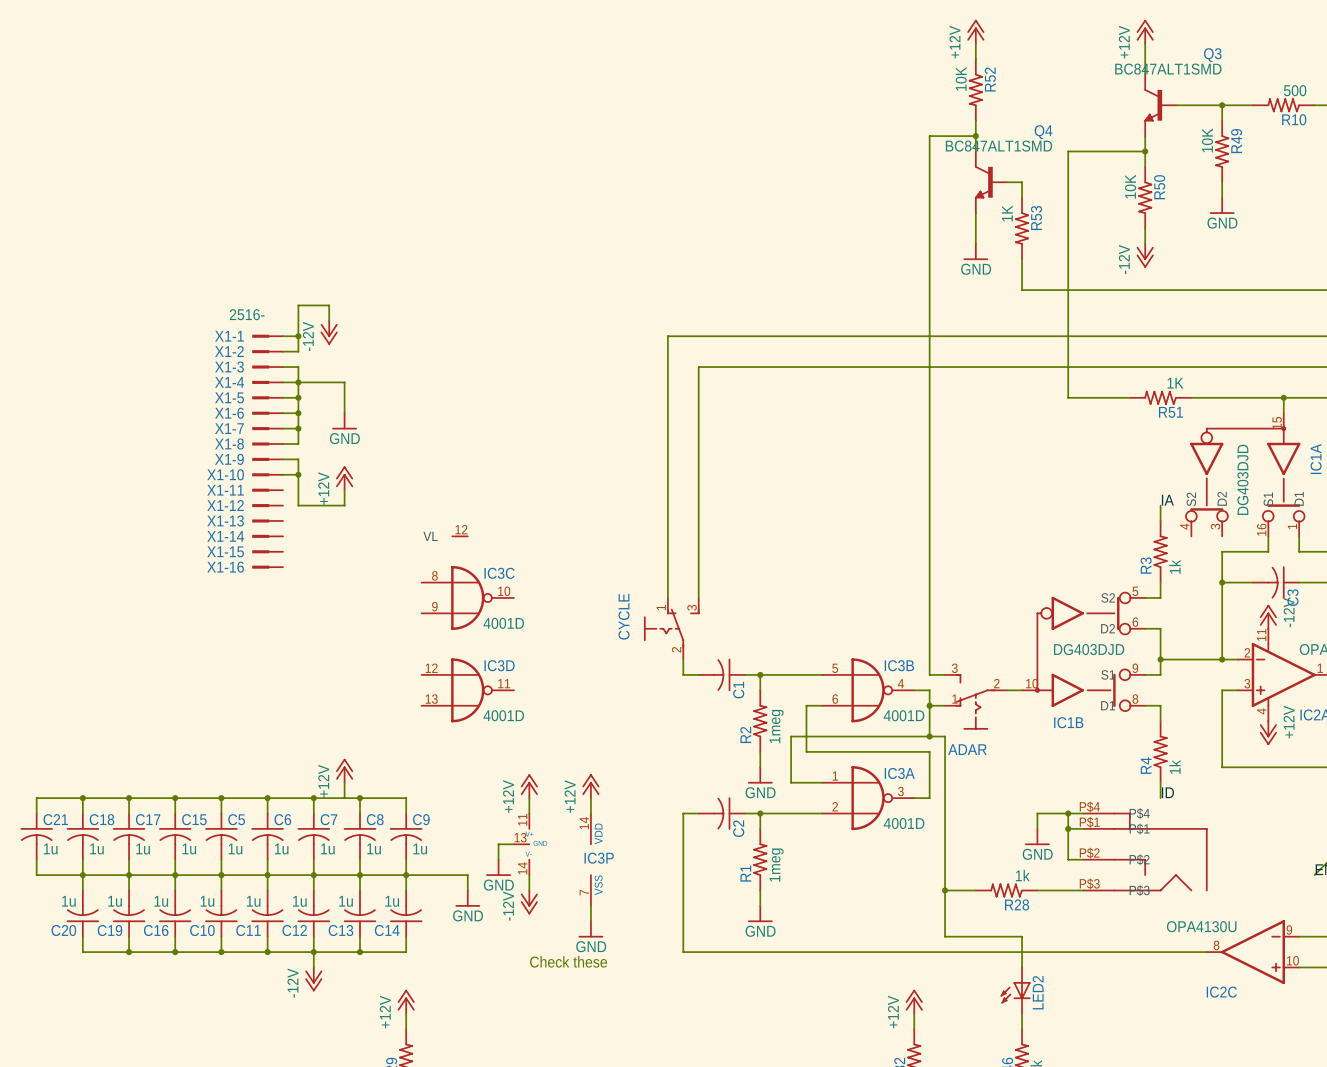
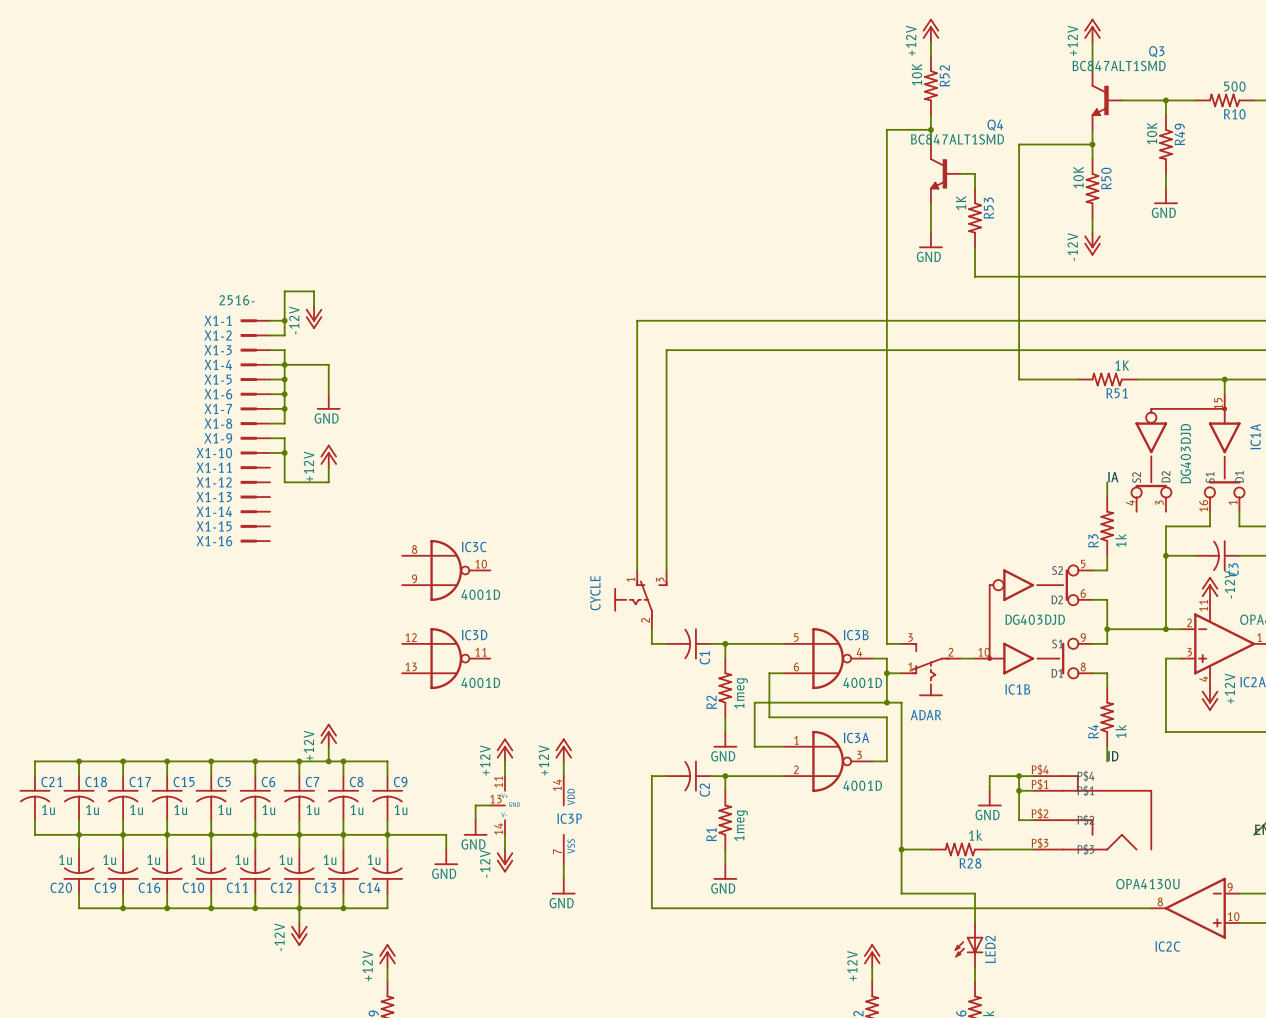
part: (460, 536) -> none
junction: none -> (328, 761)
text: Check these (568, 961) -> none

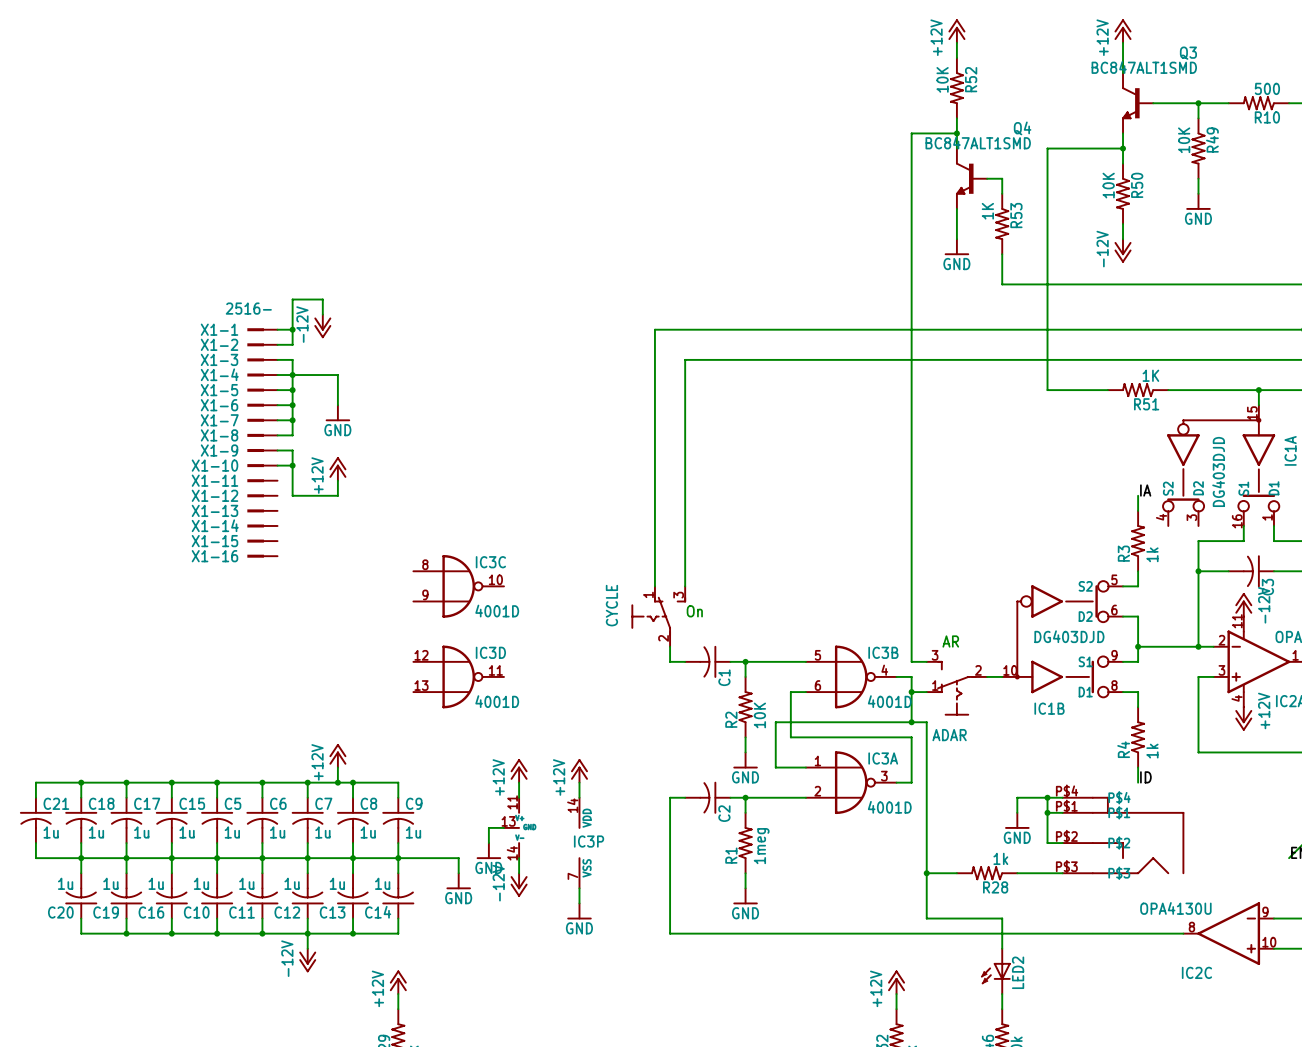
text: none -> On (694, 611)
text: none -> AR (950, 641)
R2 value: 1meg (741, 693) -> 10K (759, 715)

